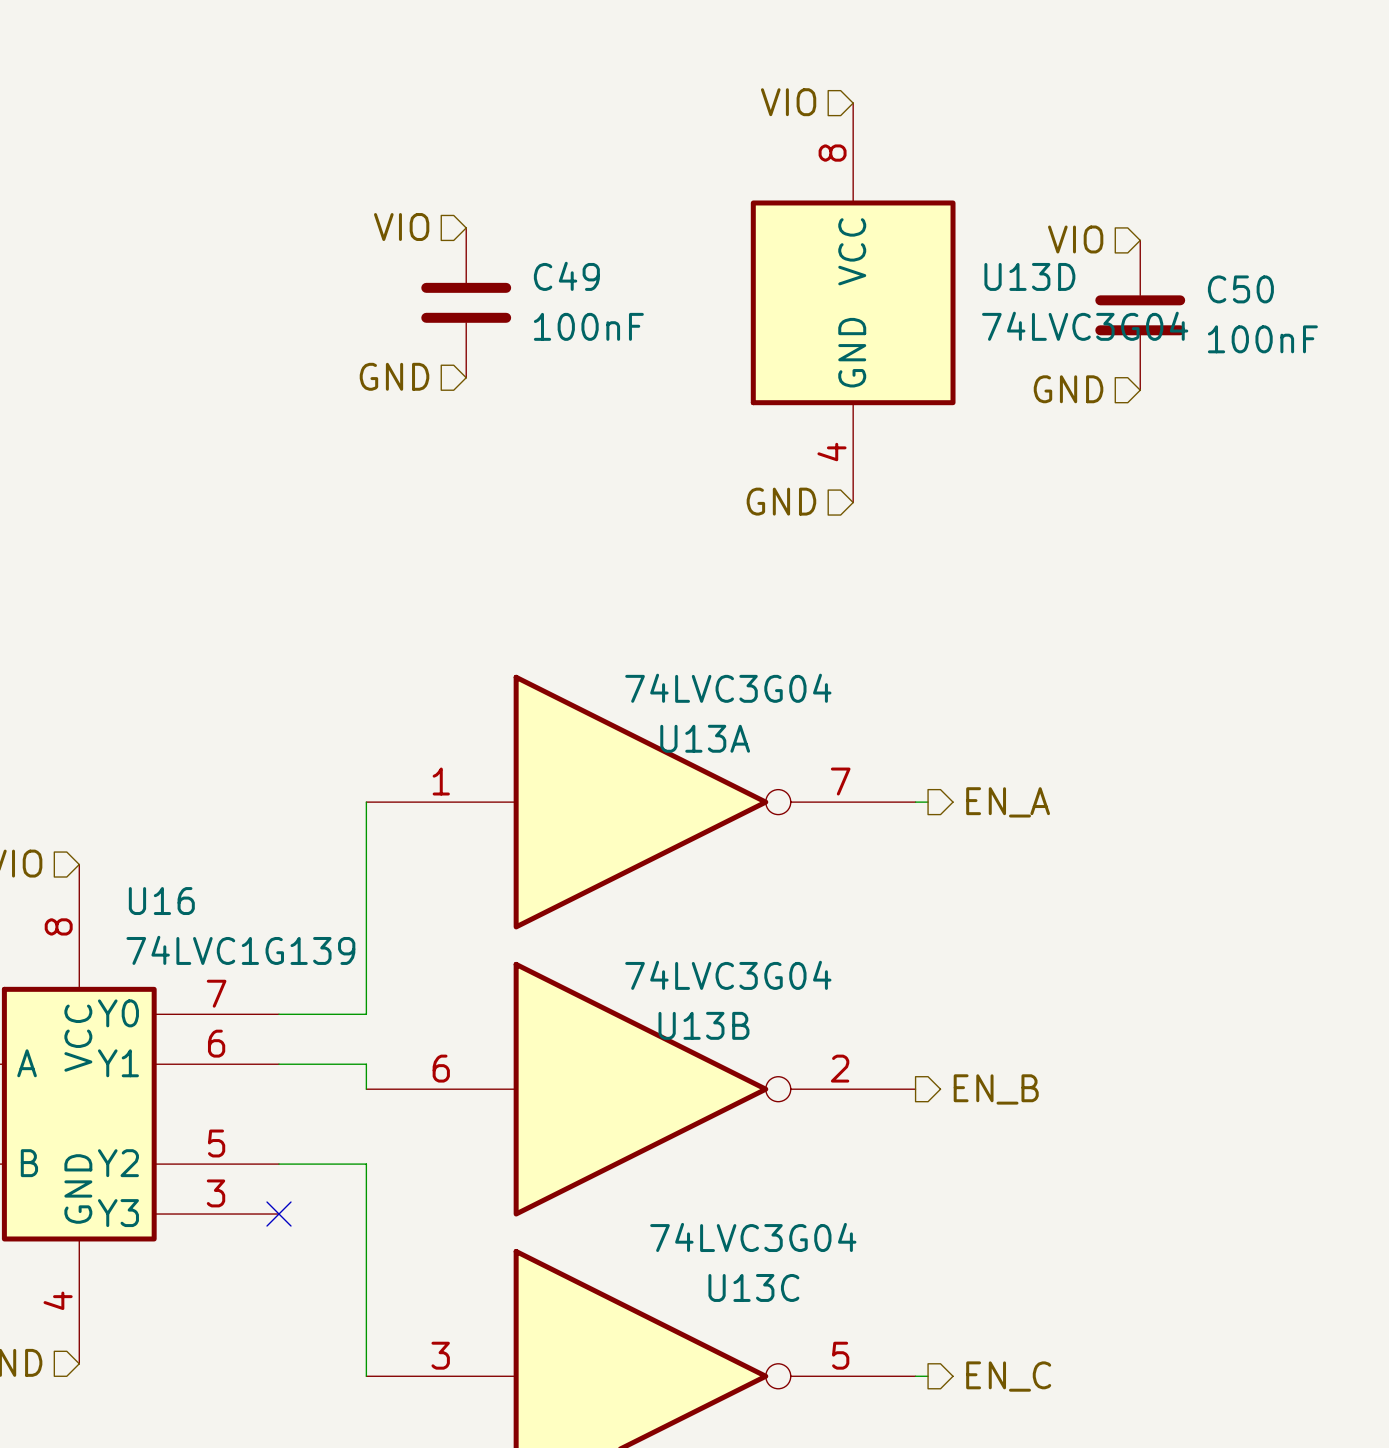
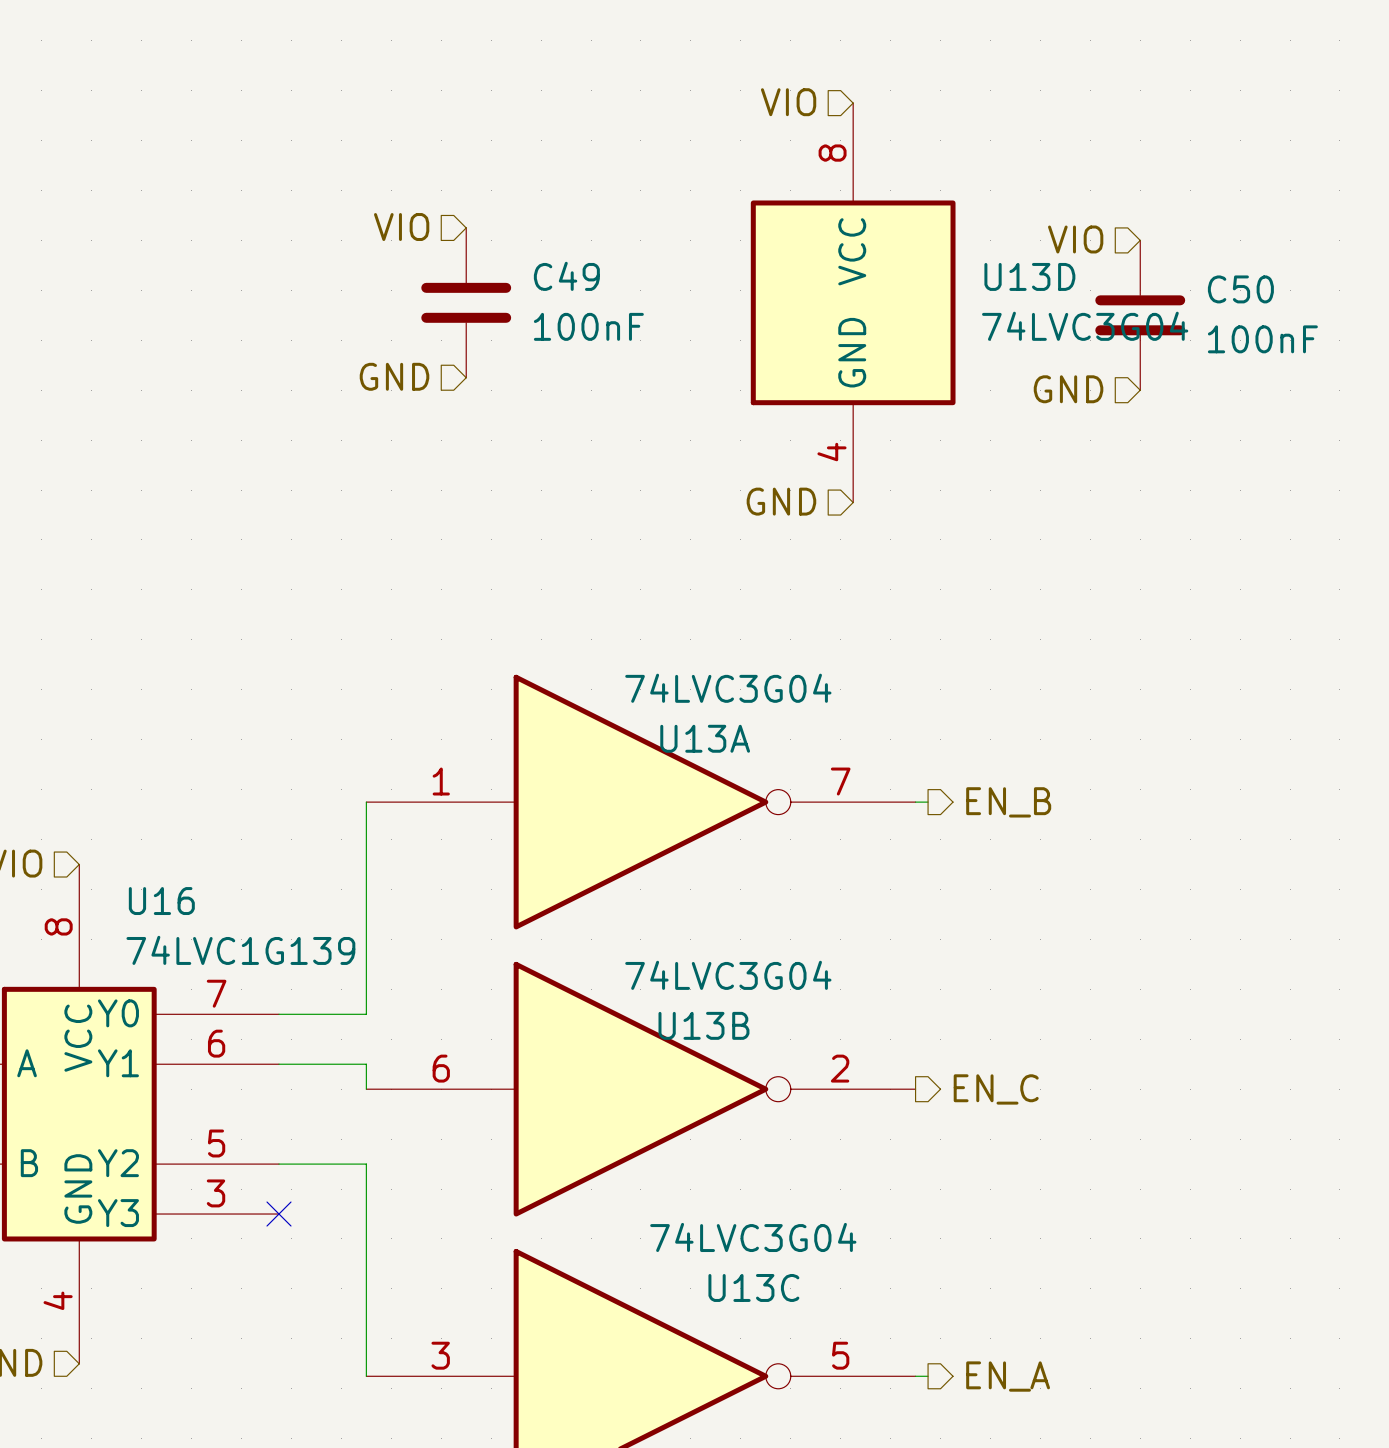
hierarchical label: EN_A (1008, 802) -> EN_B (1008, 802)
hierarchical label: EN_B (996, 1089) -> EN_C (996, 1089)
hierarchical label: EN_C (1008, 1376) -> EN_A (1008, 1376)

